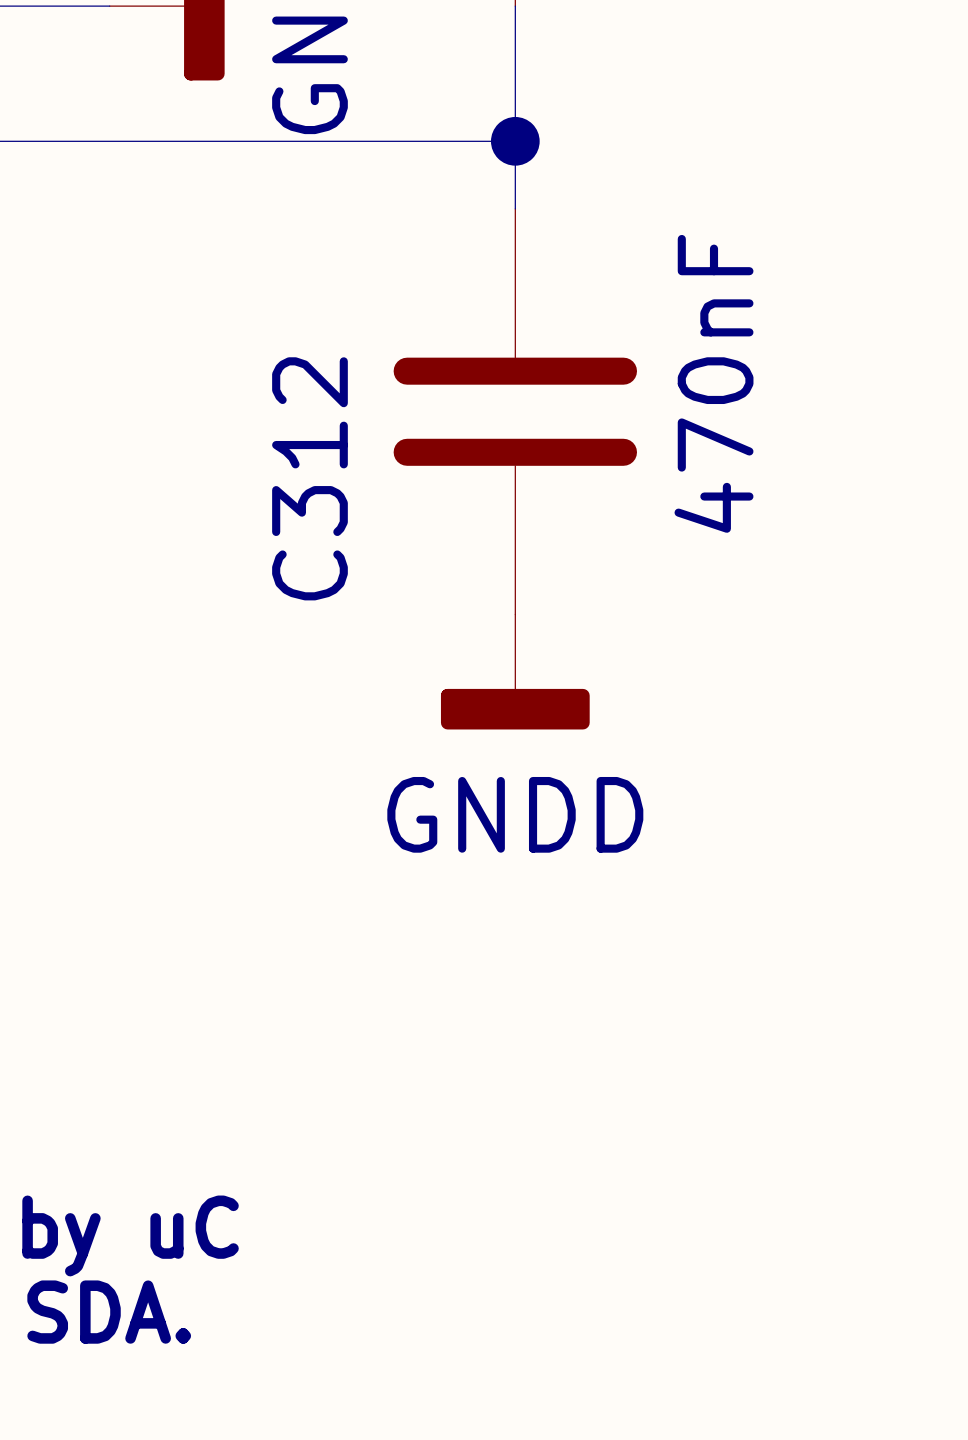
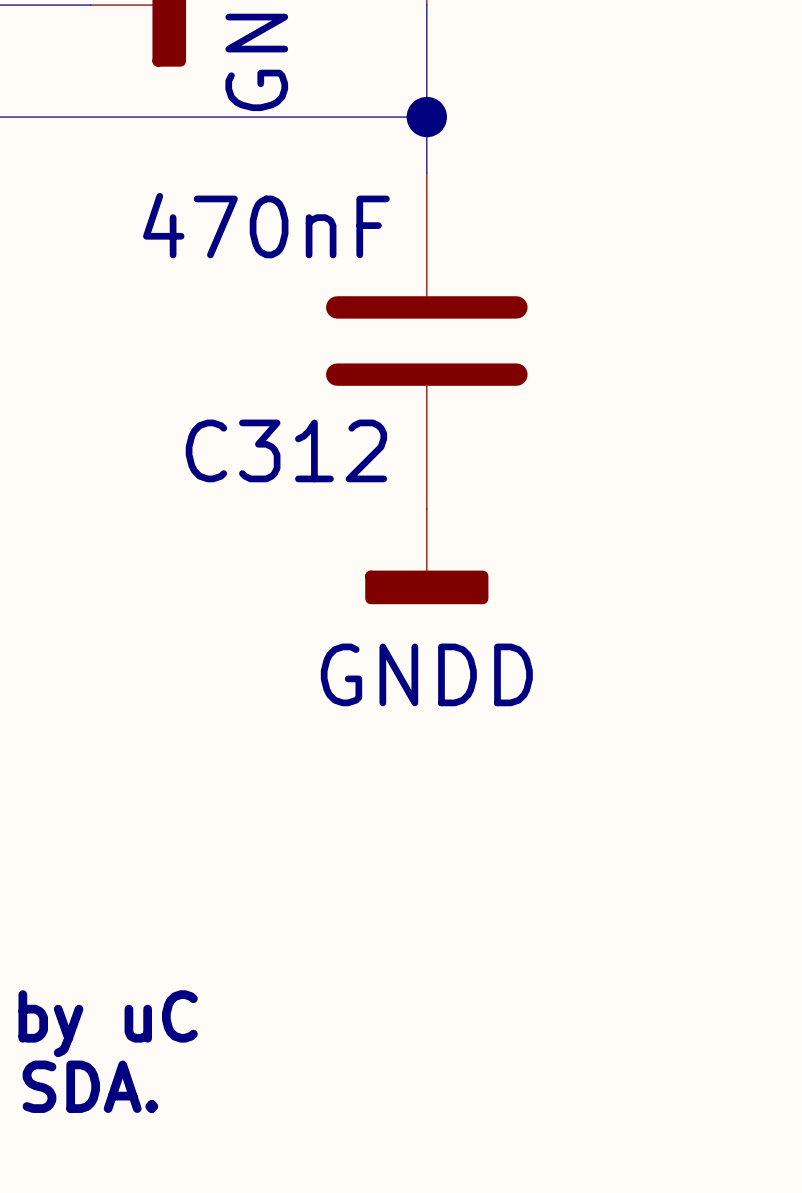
C312 value rotation: 0° (714, 383) -> 90° clockwise (266, 225)
C312 value position: 470nF (714, 383) -> 470nF (266, 225)
C312 name rotation: 0° (309, 478) -> 90° clockwise (286, 450)

